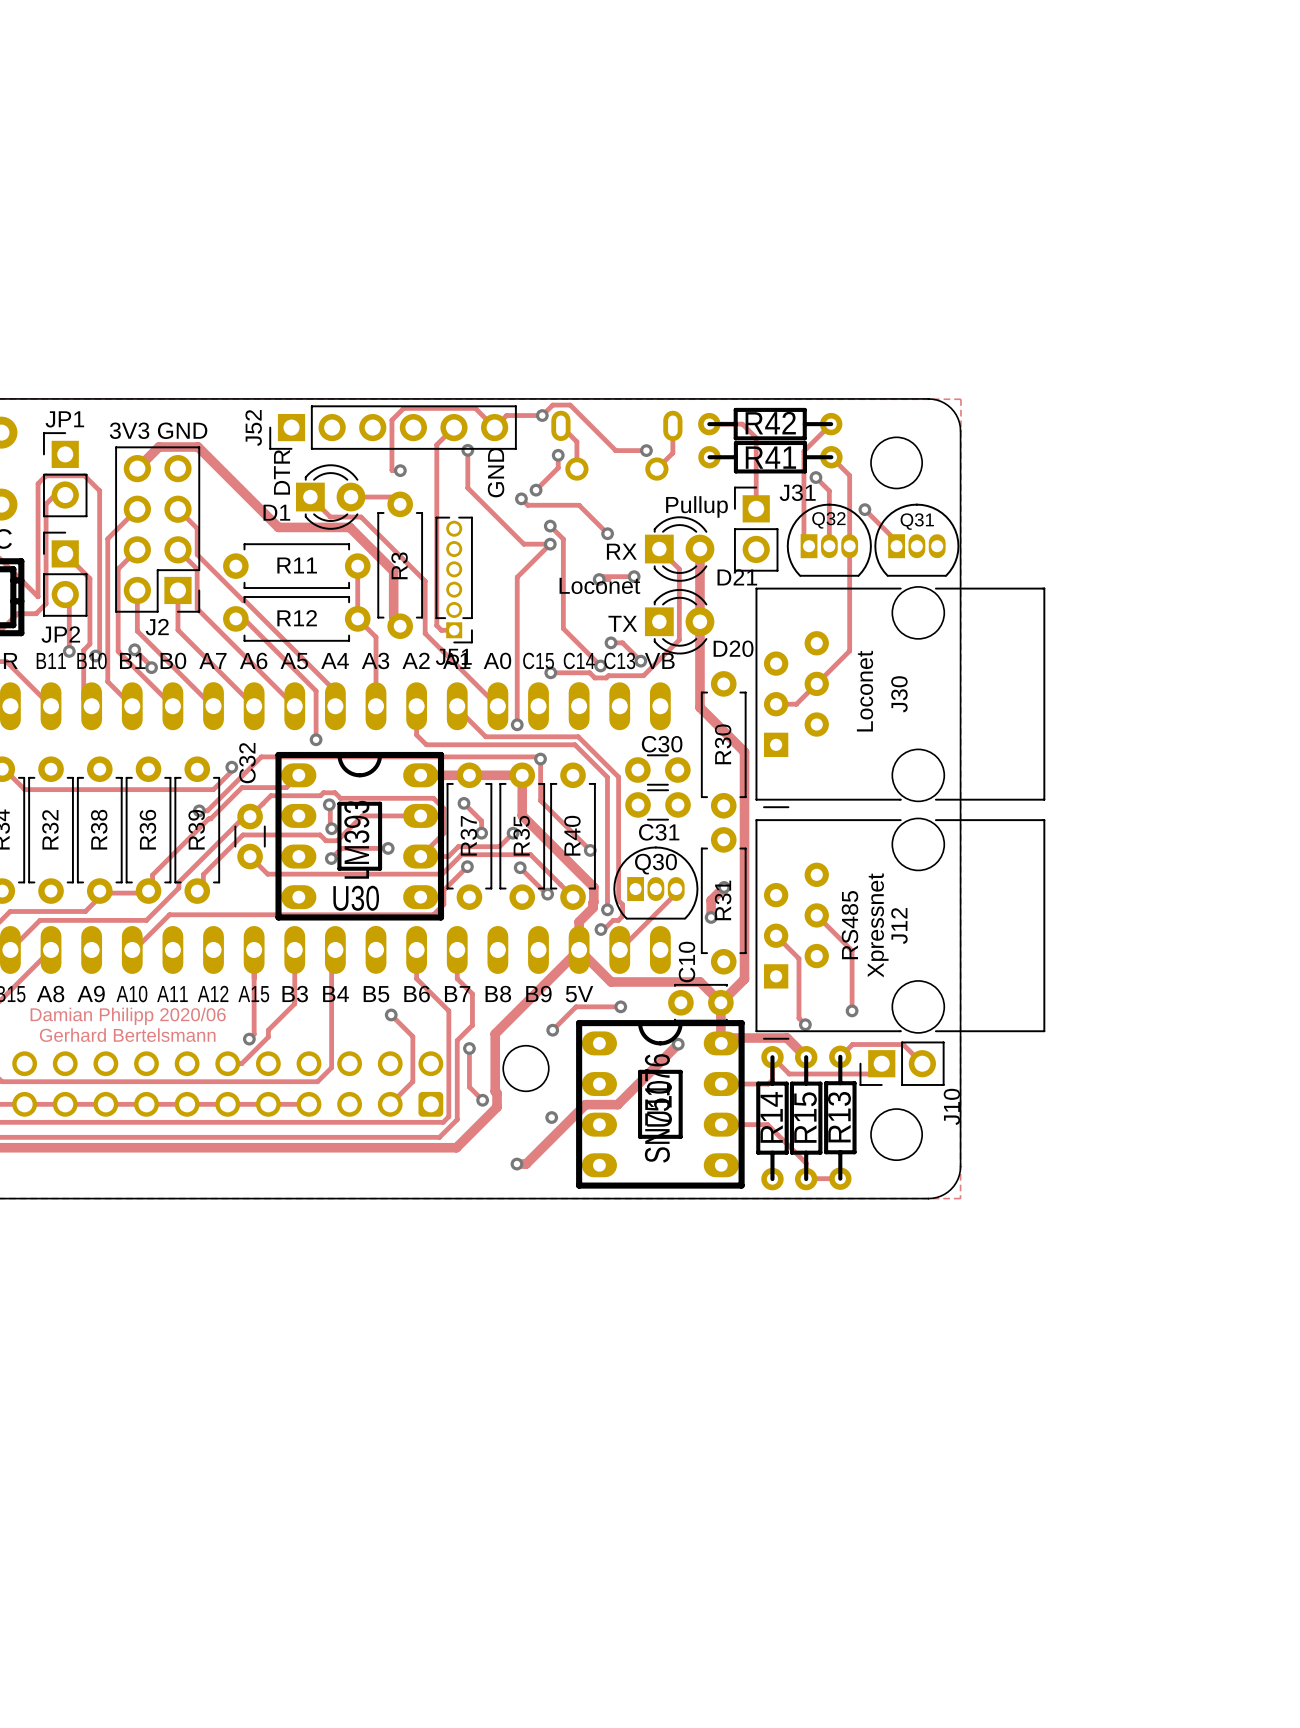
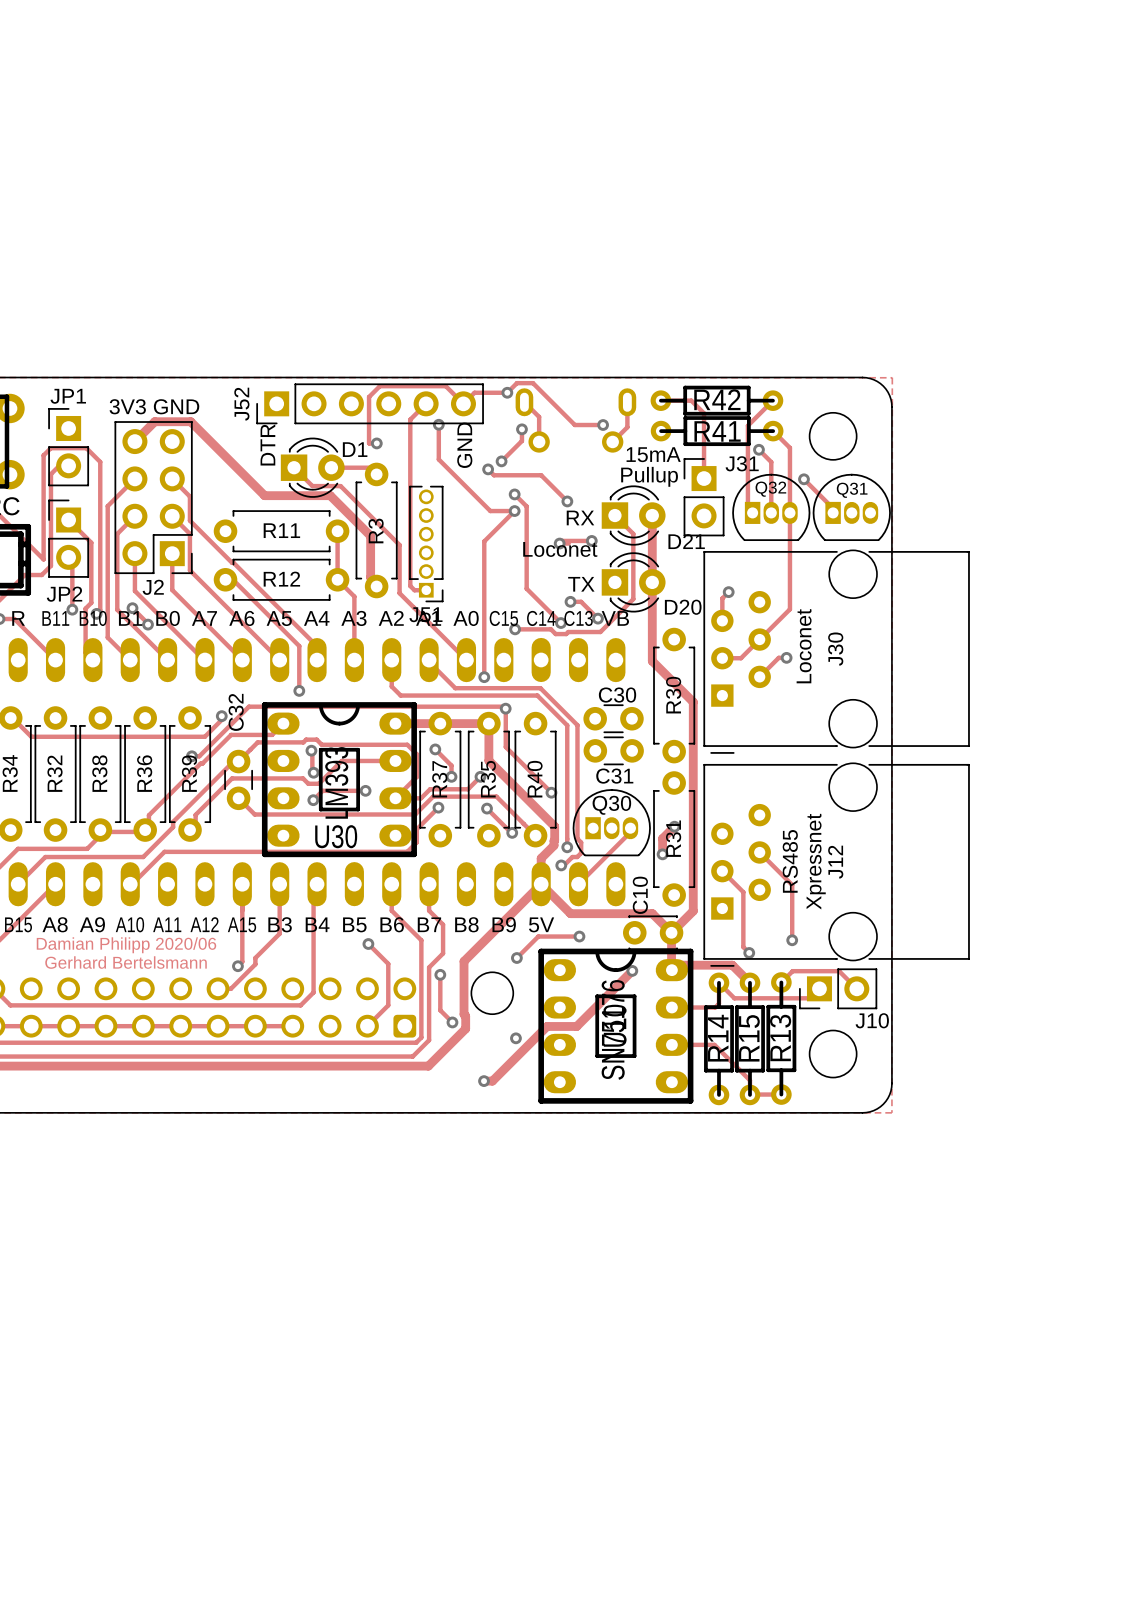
text: none -> 15mA (653, 454)
D1 name position: D1 (276, 512) -> D1 (355, 449)
track: none -> (728, 592) (722, 598) (722, 620)
via: none -> (728, 592)
track: none -> (786, 657) (778, 657) (759, 676)
via: none -> (786, 657)
J10 name rotation: 0° (951, 1106) -> 90° clockwise (872, 1020)

